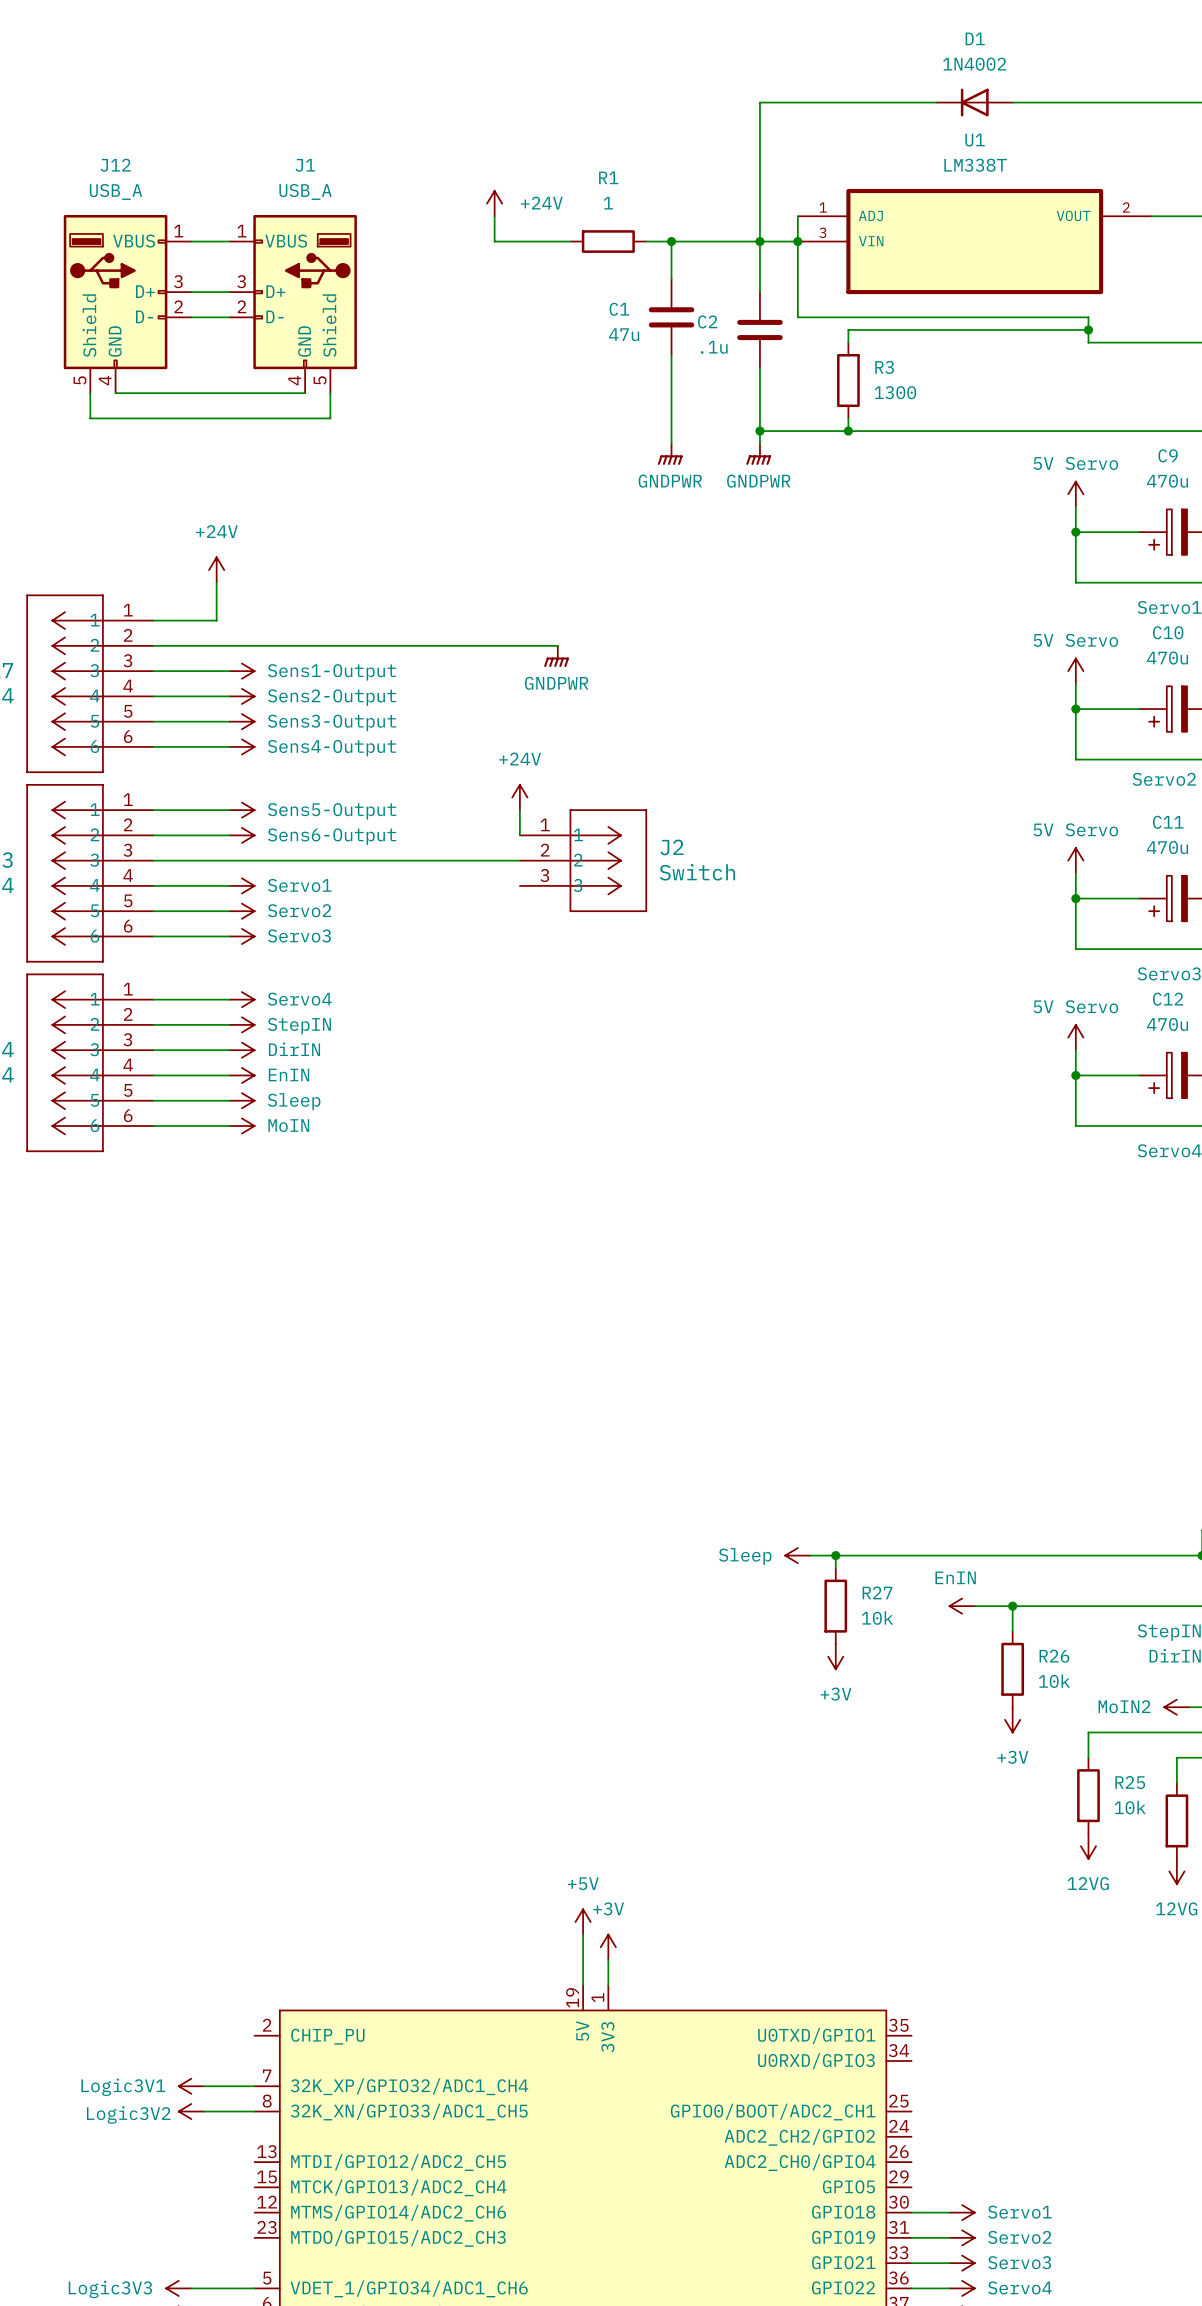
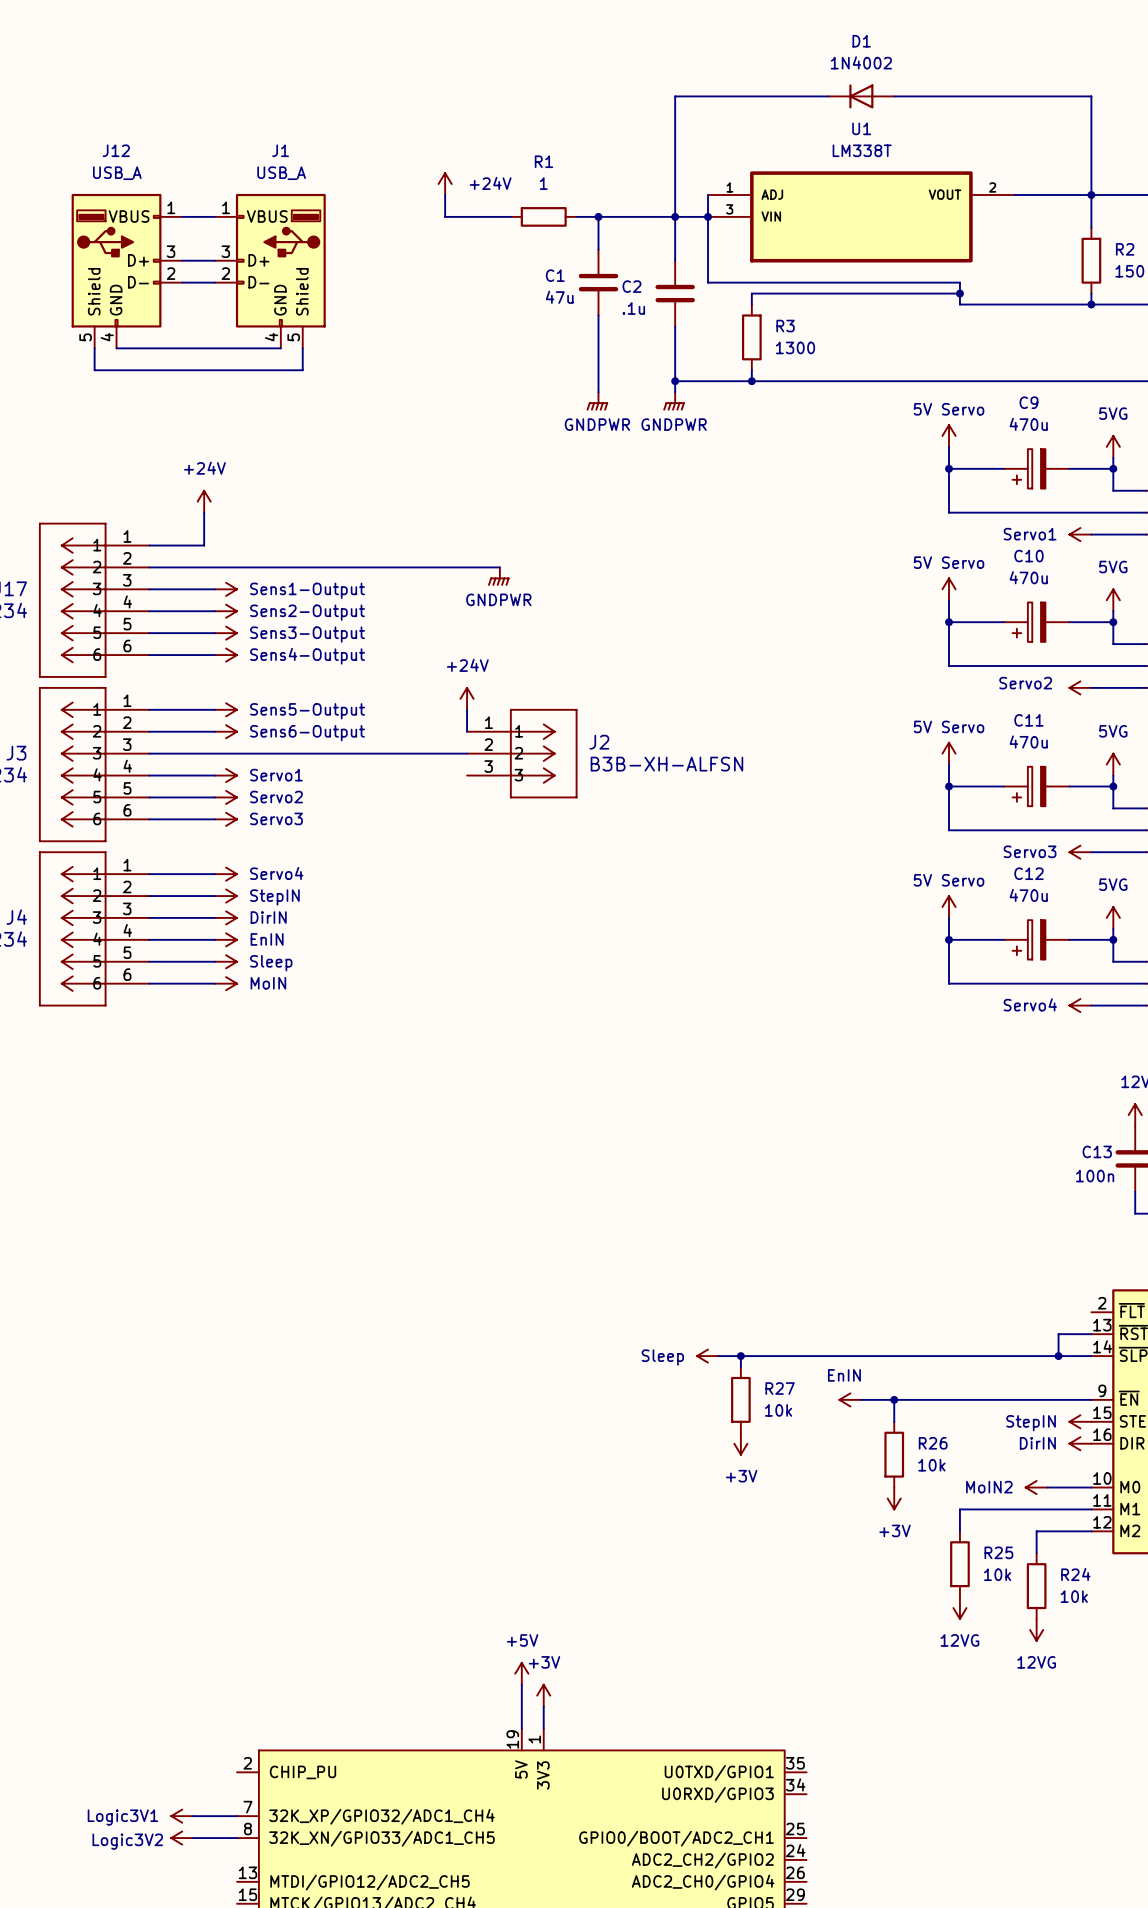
J2 value: Switch (697, 872) -> B3B-XH-ALFSN (666, 764)

